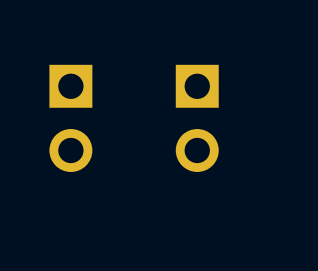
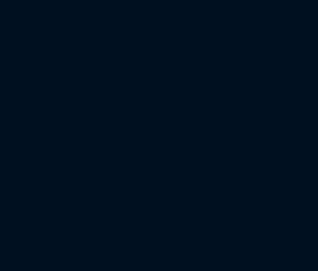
part: (70, 118) -> none
part: (197, 118) -> none

